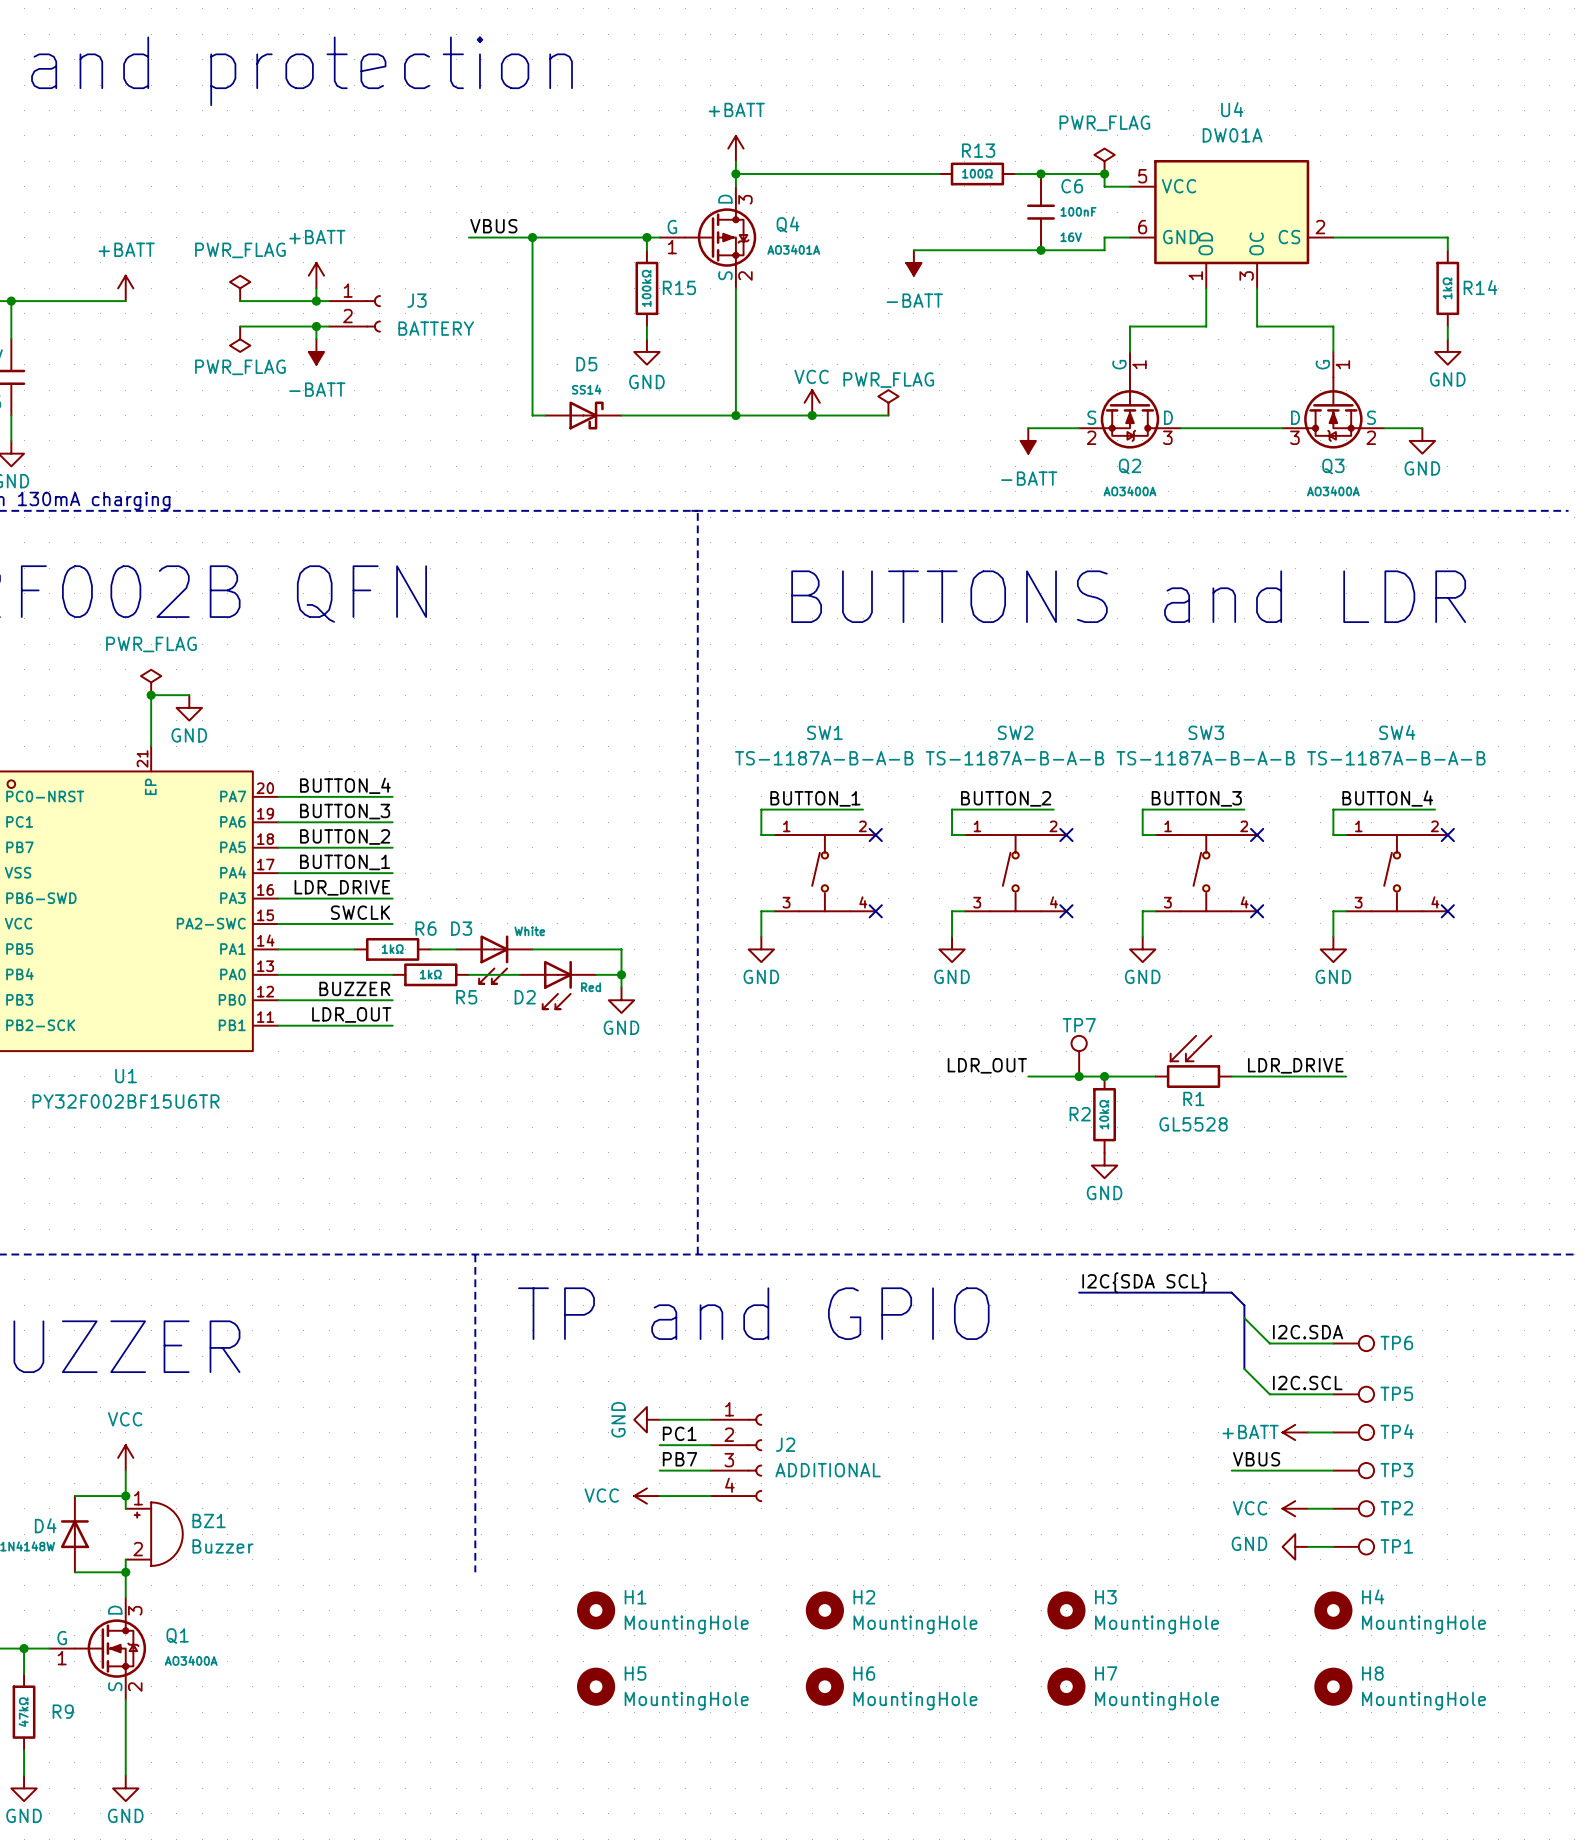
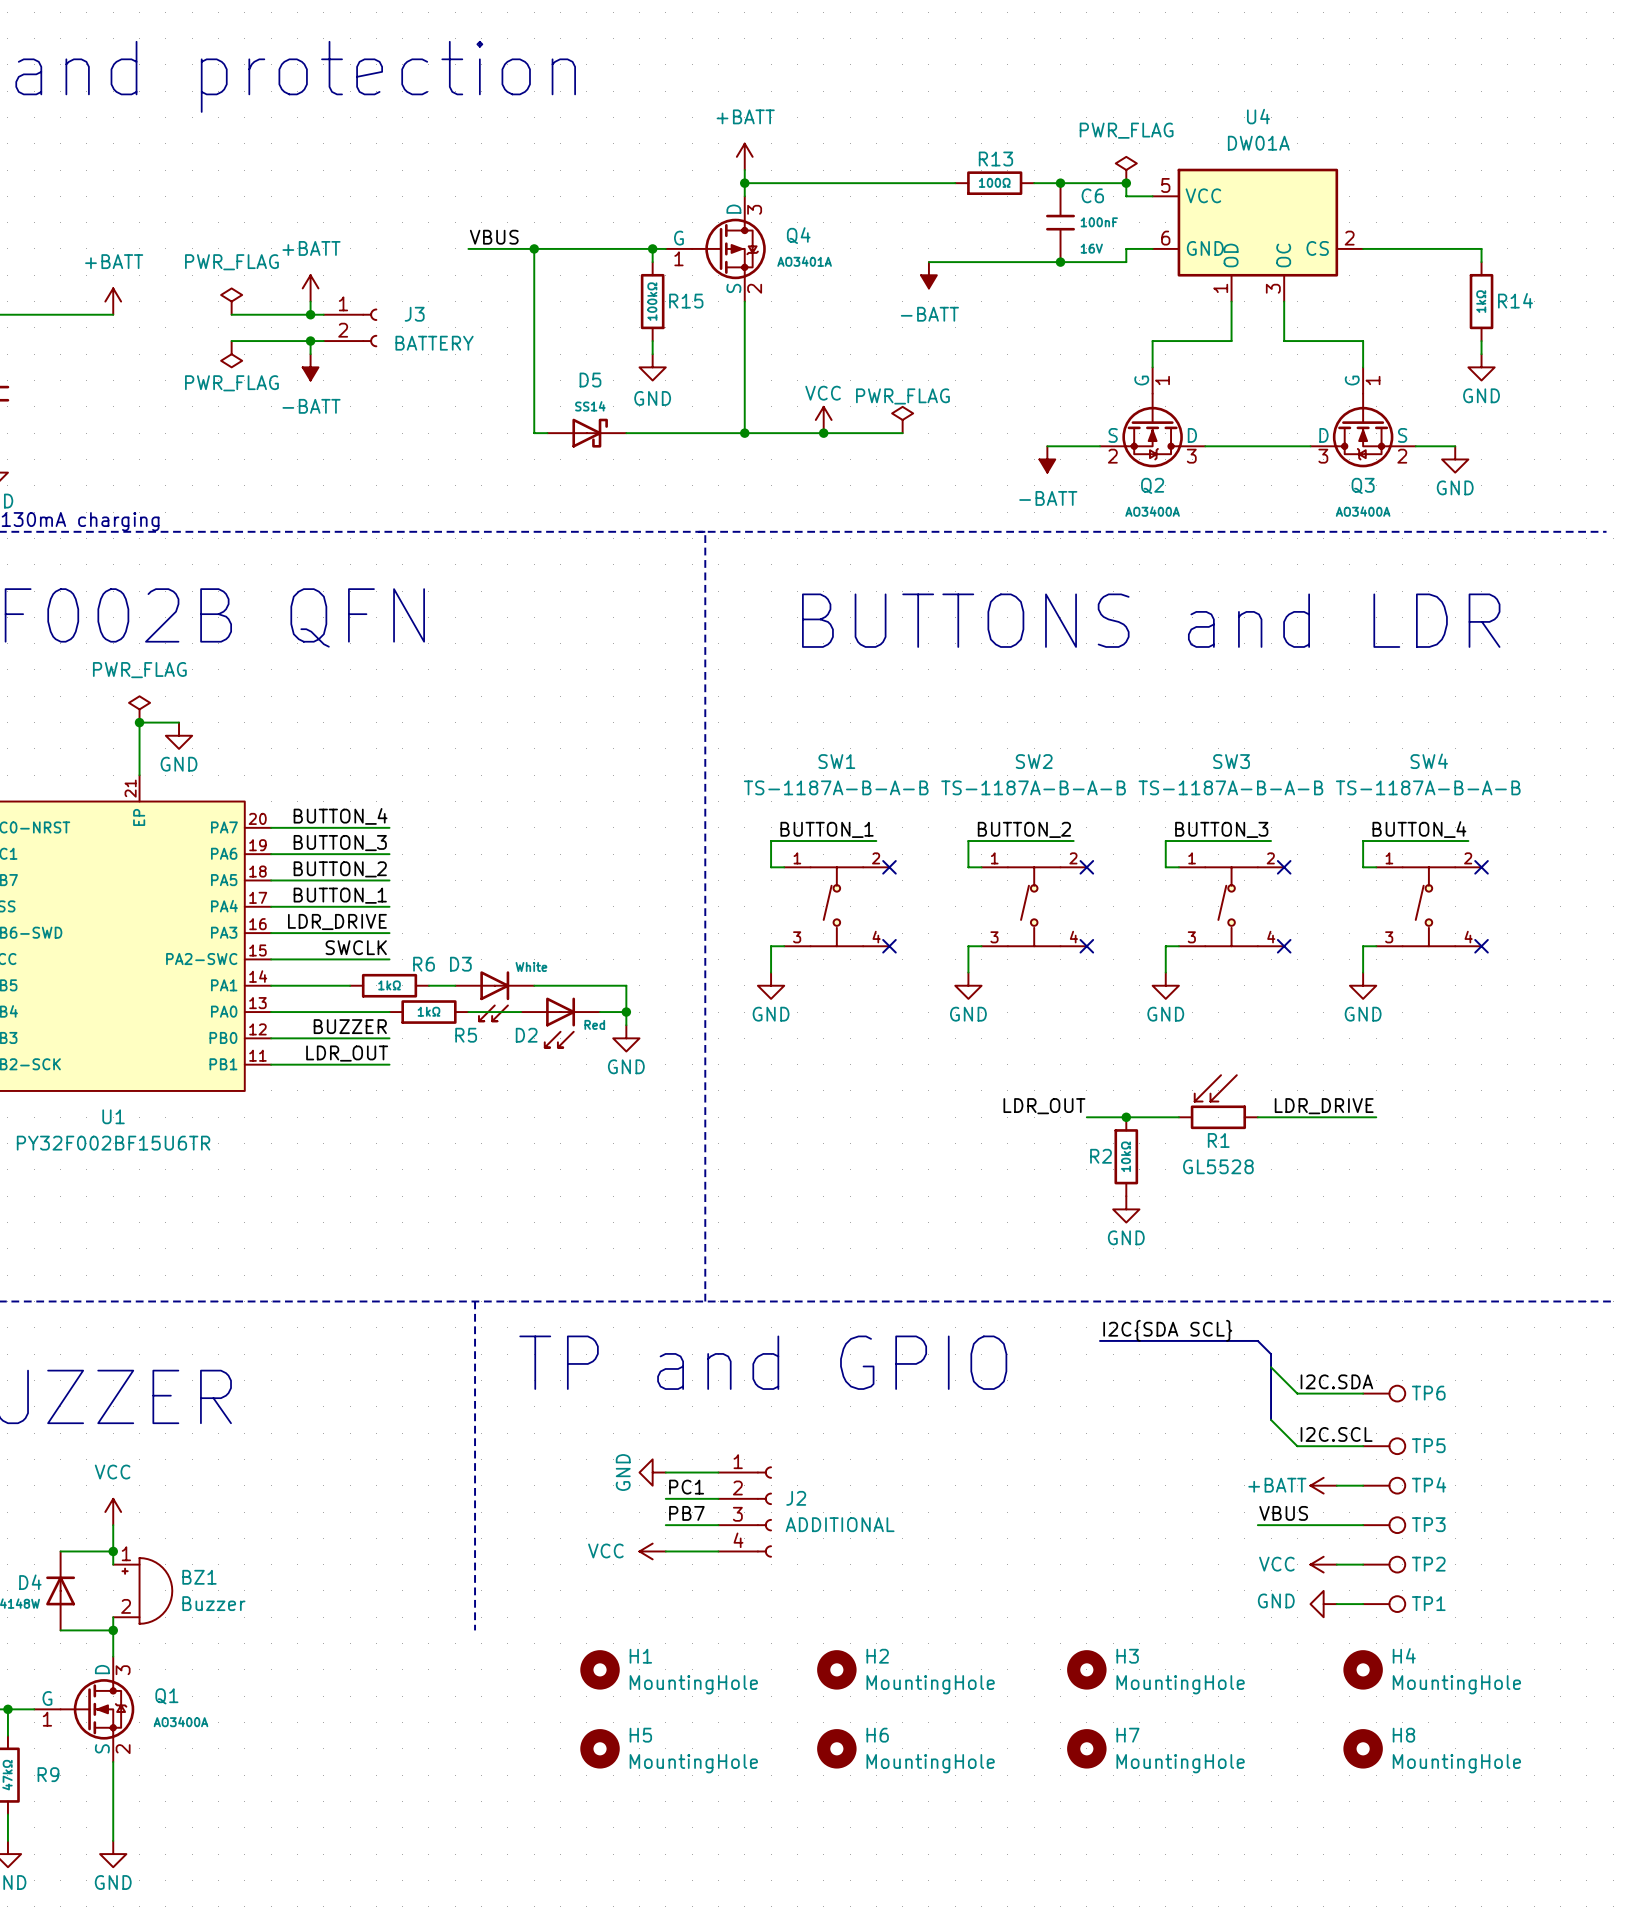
TP7: (1079, 1056) -> none
label position: LDR_OUT (987, 1065) -> LDR_OUT (1044, 1106)
wire: (1028, 1076) (1066, 1076) -> none
junction: (1079, 1076) -> none

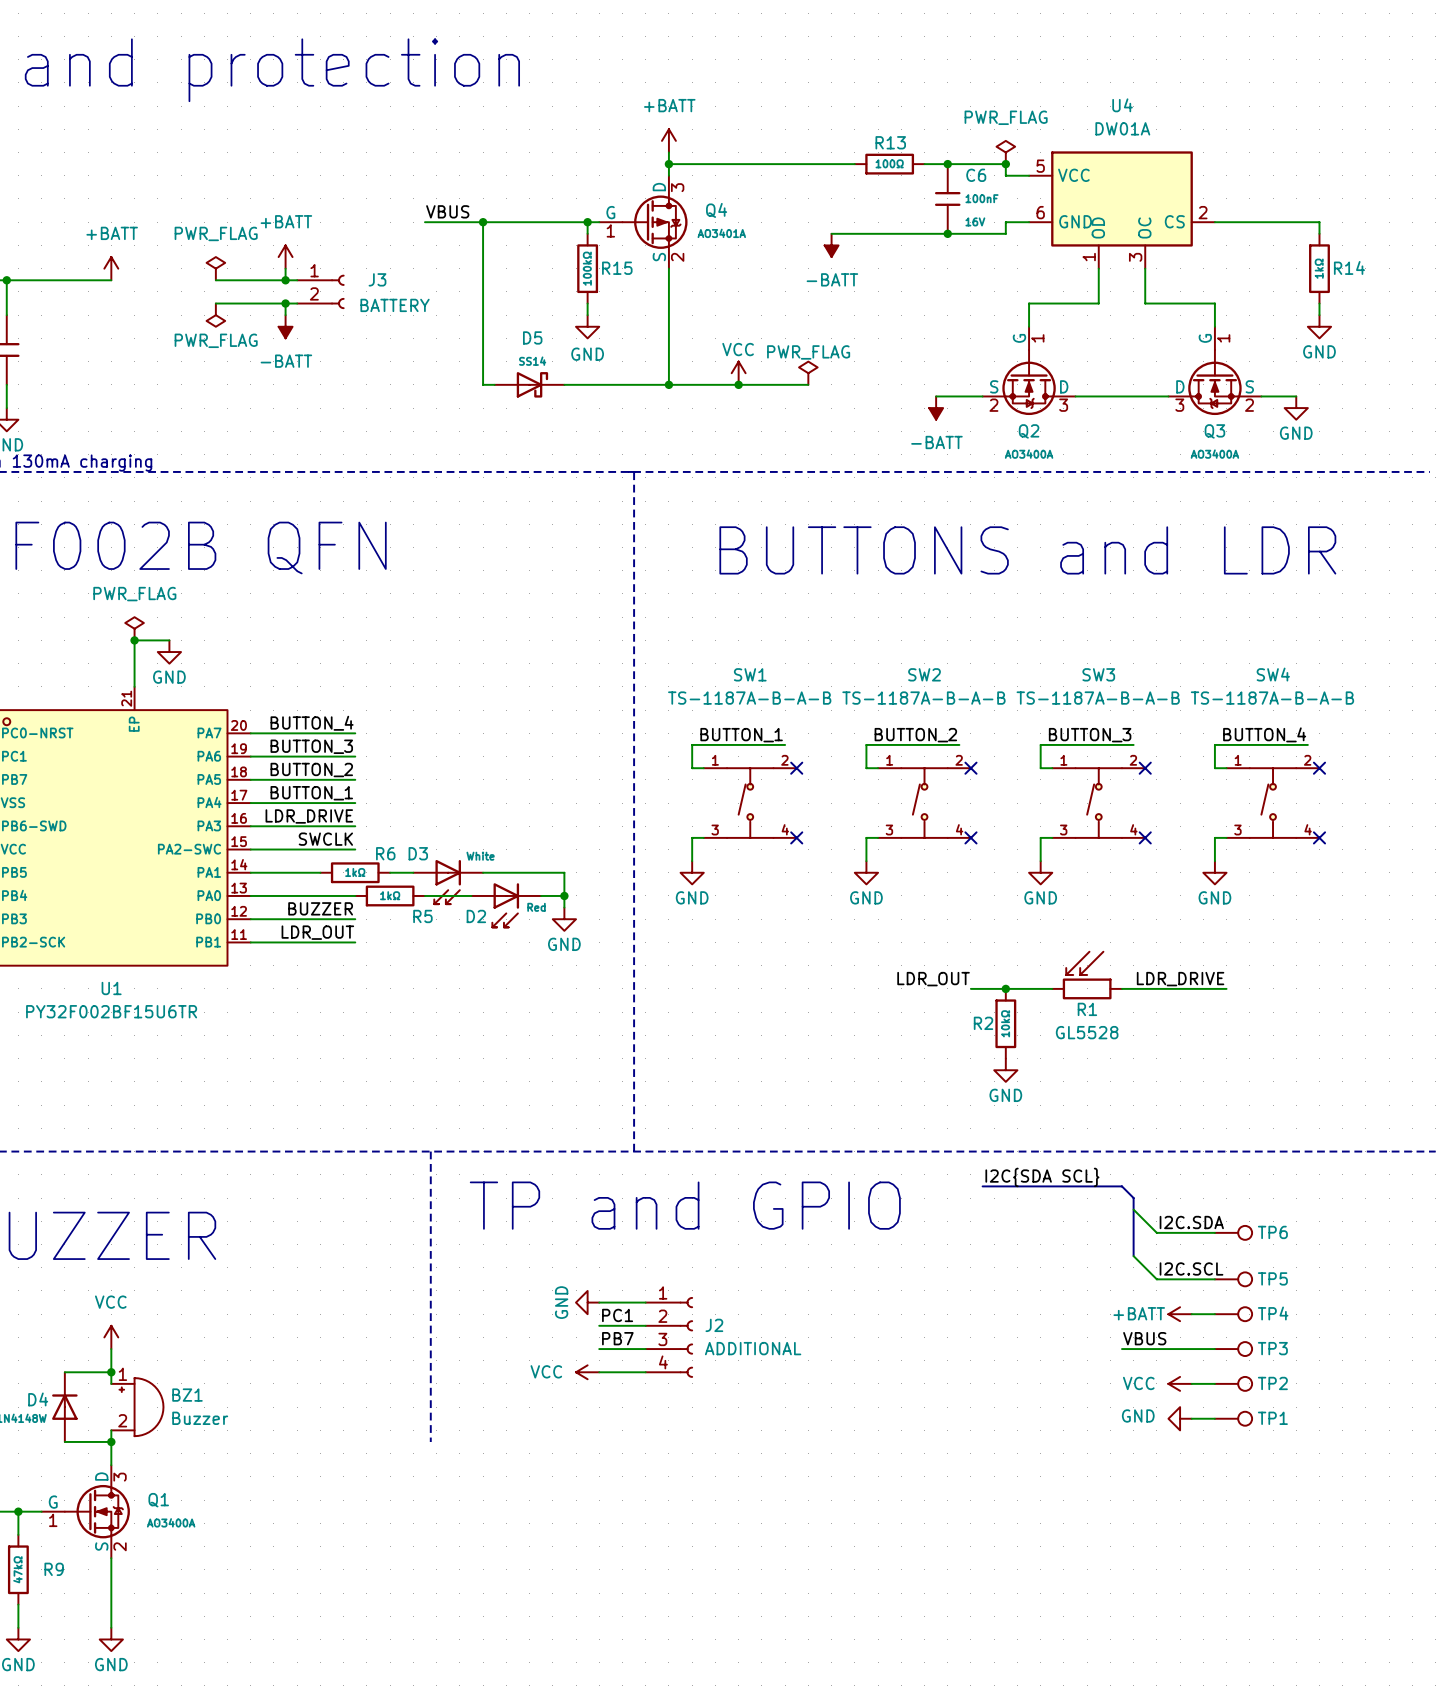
H1: MountingHole (600, 1669) -> none
H2: MountingHole (836, 1669) -> none
H3: MountingHole (1086, 1669) -> none
H4: MountingHole (1363, 1669) -> none
H5: MountingHole (600, 1748) -> none
H6: MountingHole (836, 1748) -> none
H7: MountingHole (1086, 1748) -> none
H8: MountingHole (1363, 1748) -> none

